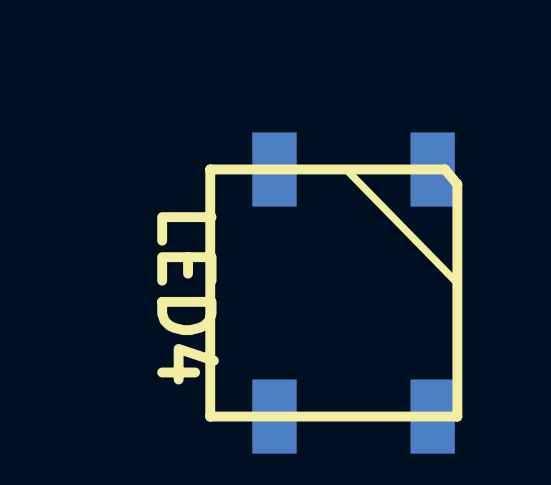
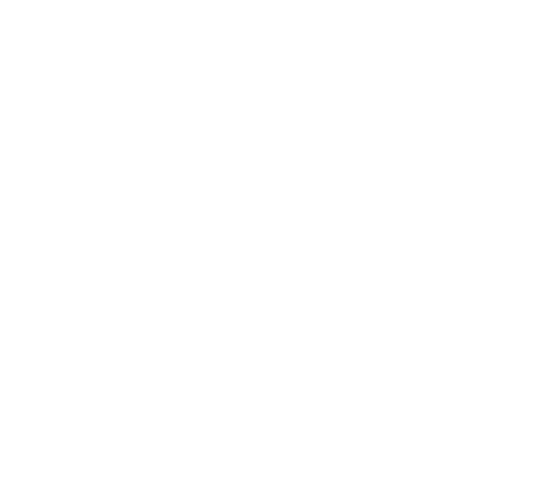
part: (333, 293) -> none

